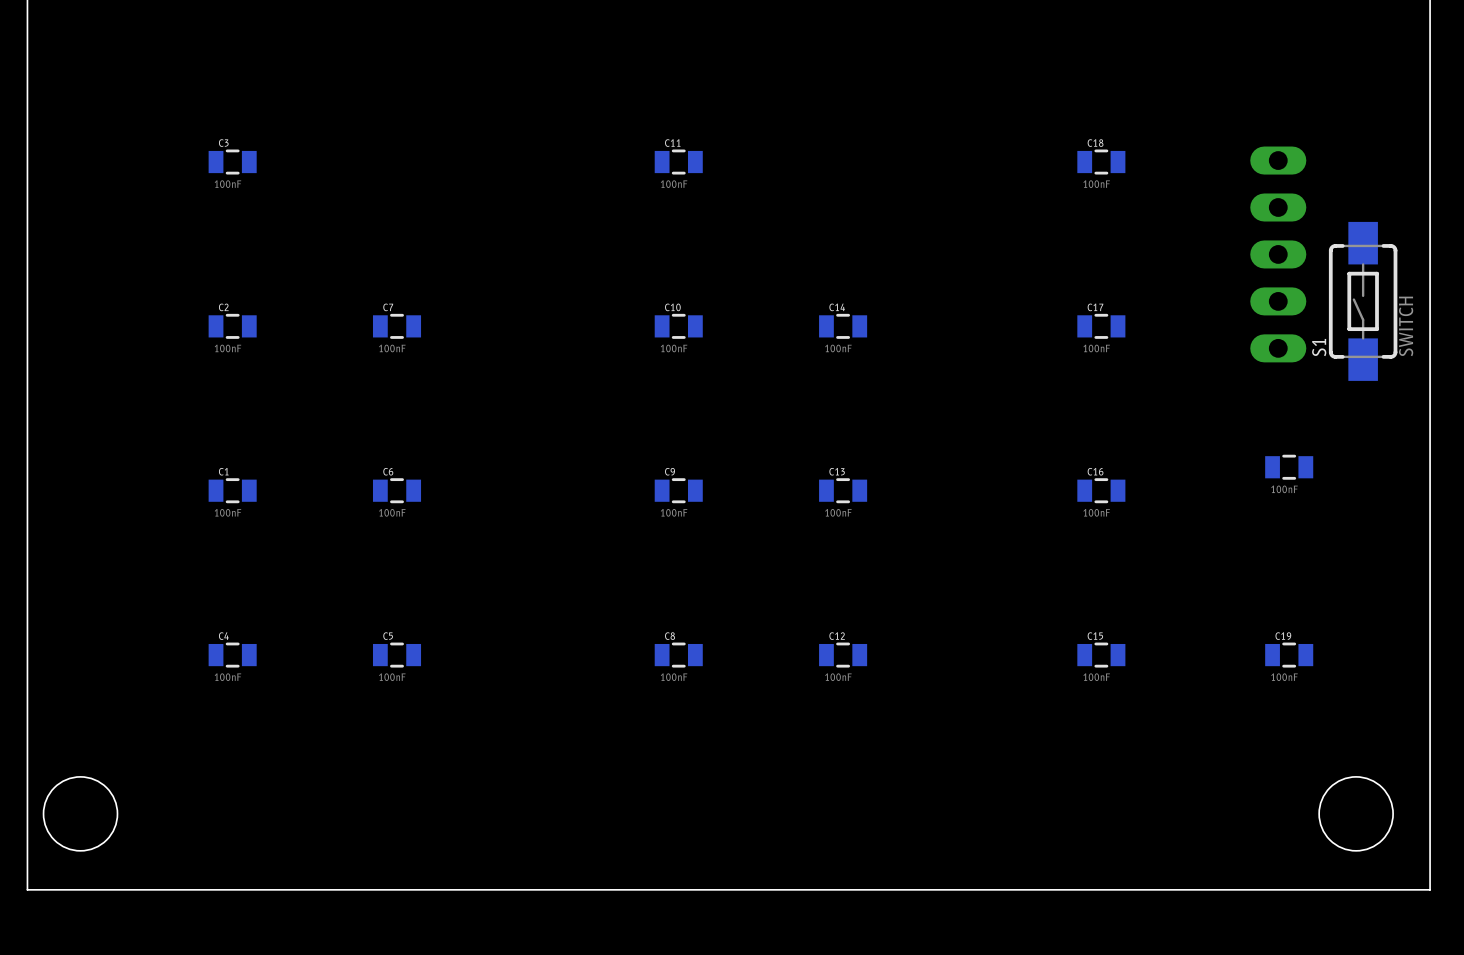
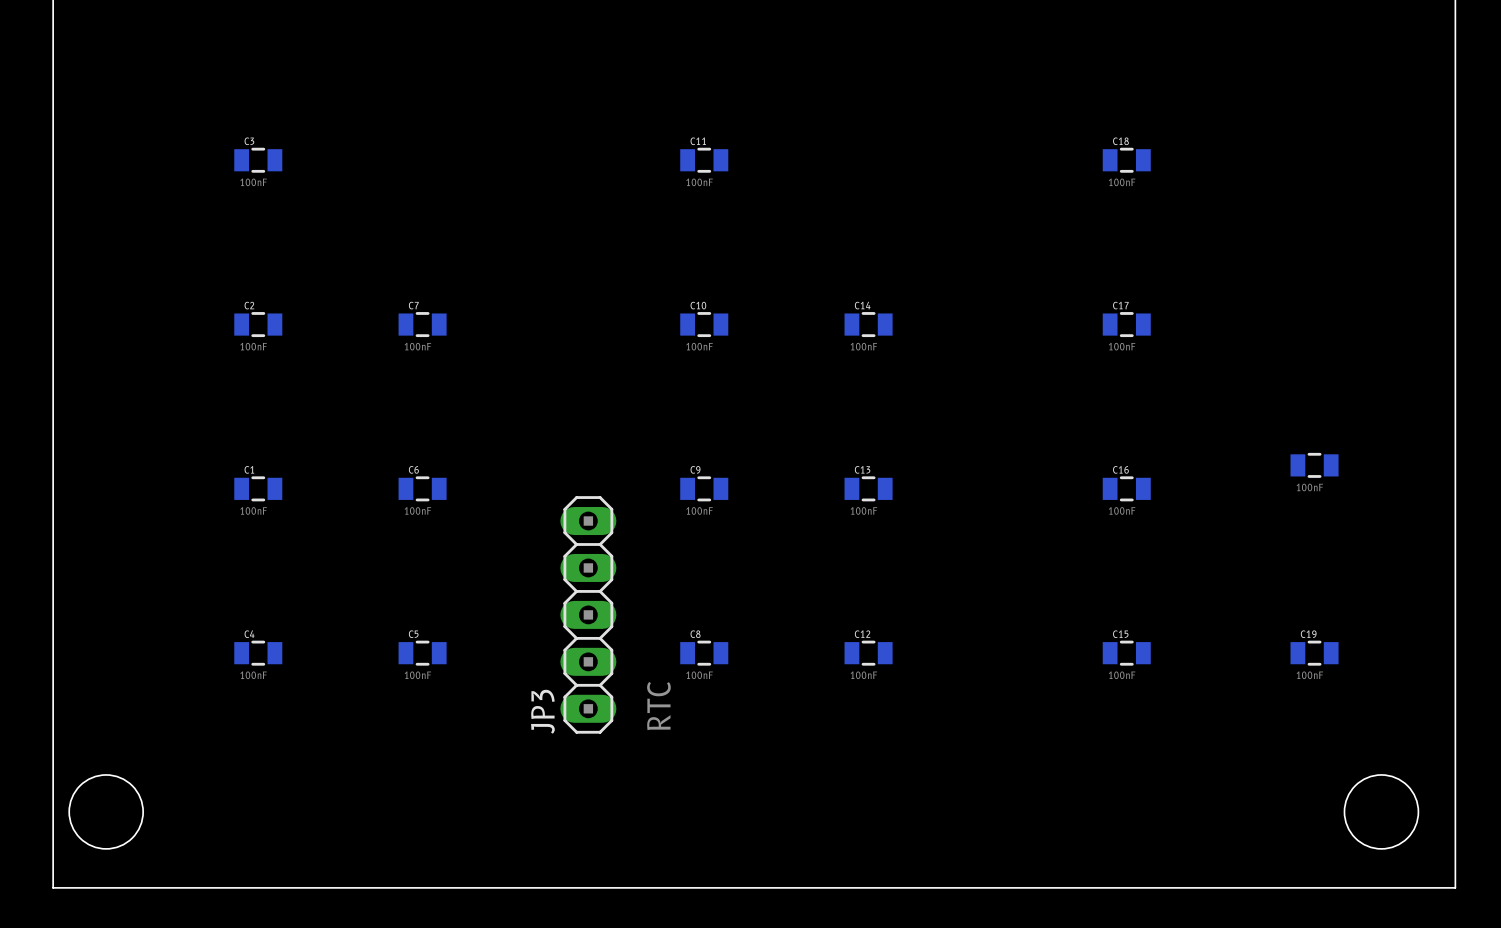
part: (1278, 254) -> none
S1: SWITCH (1363, 301) -> none
JP3: none -> RTC (588, 614)

